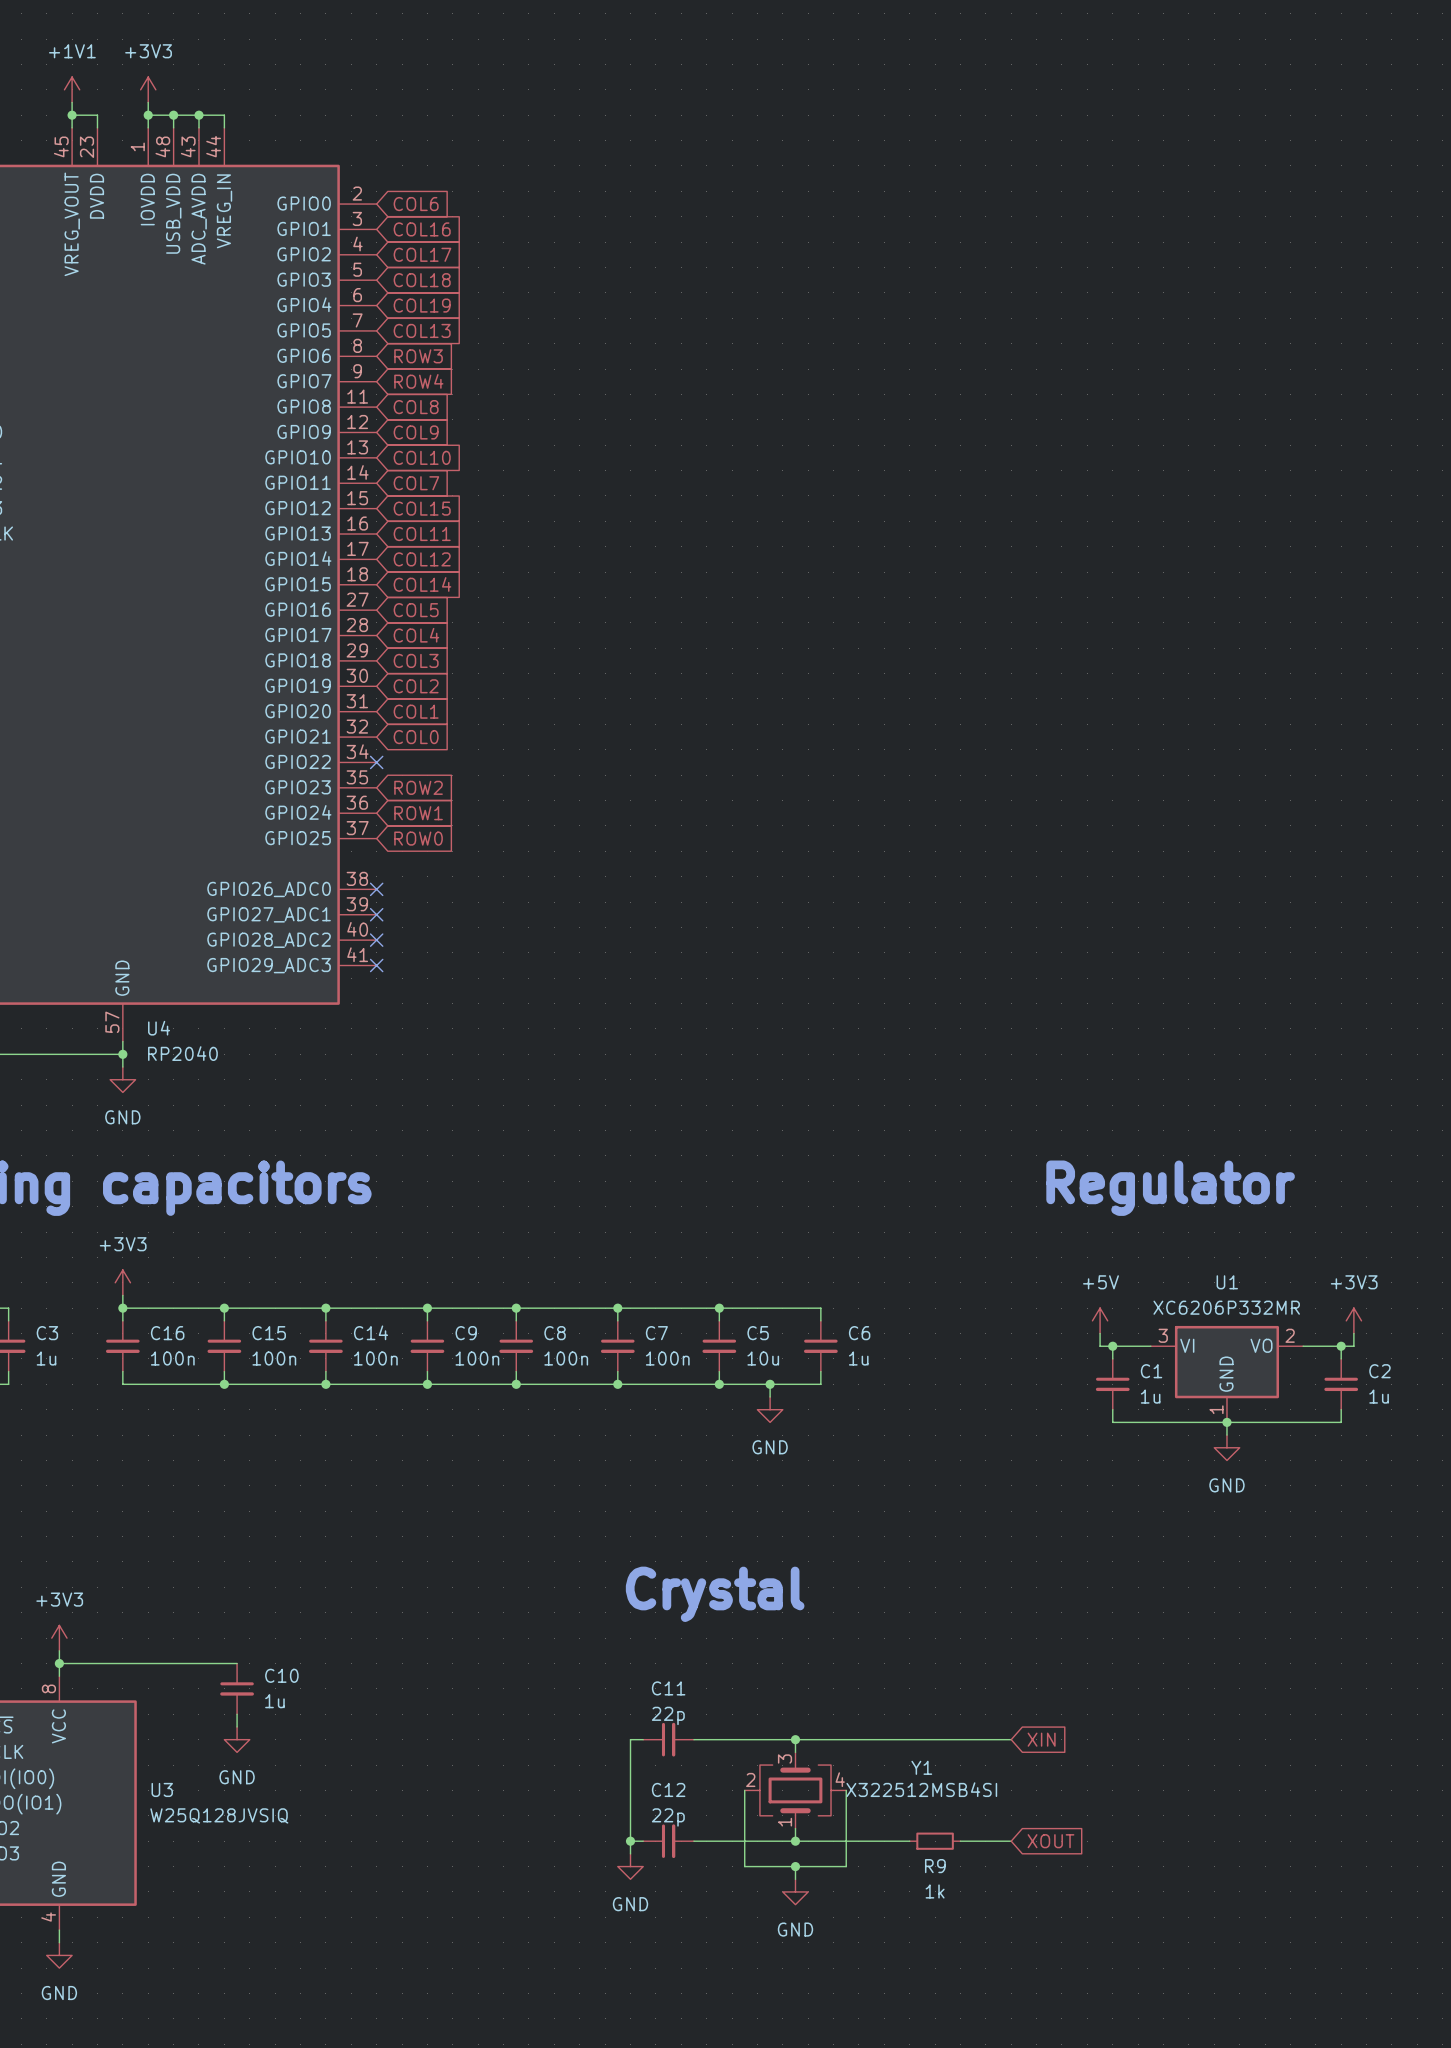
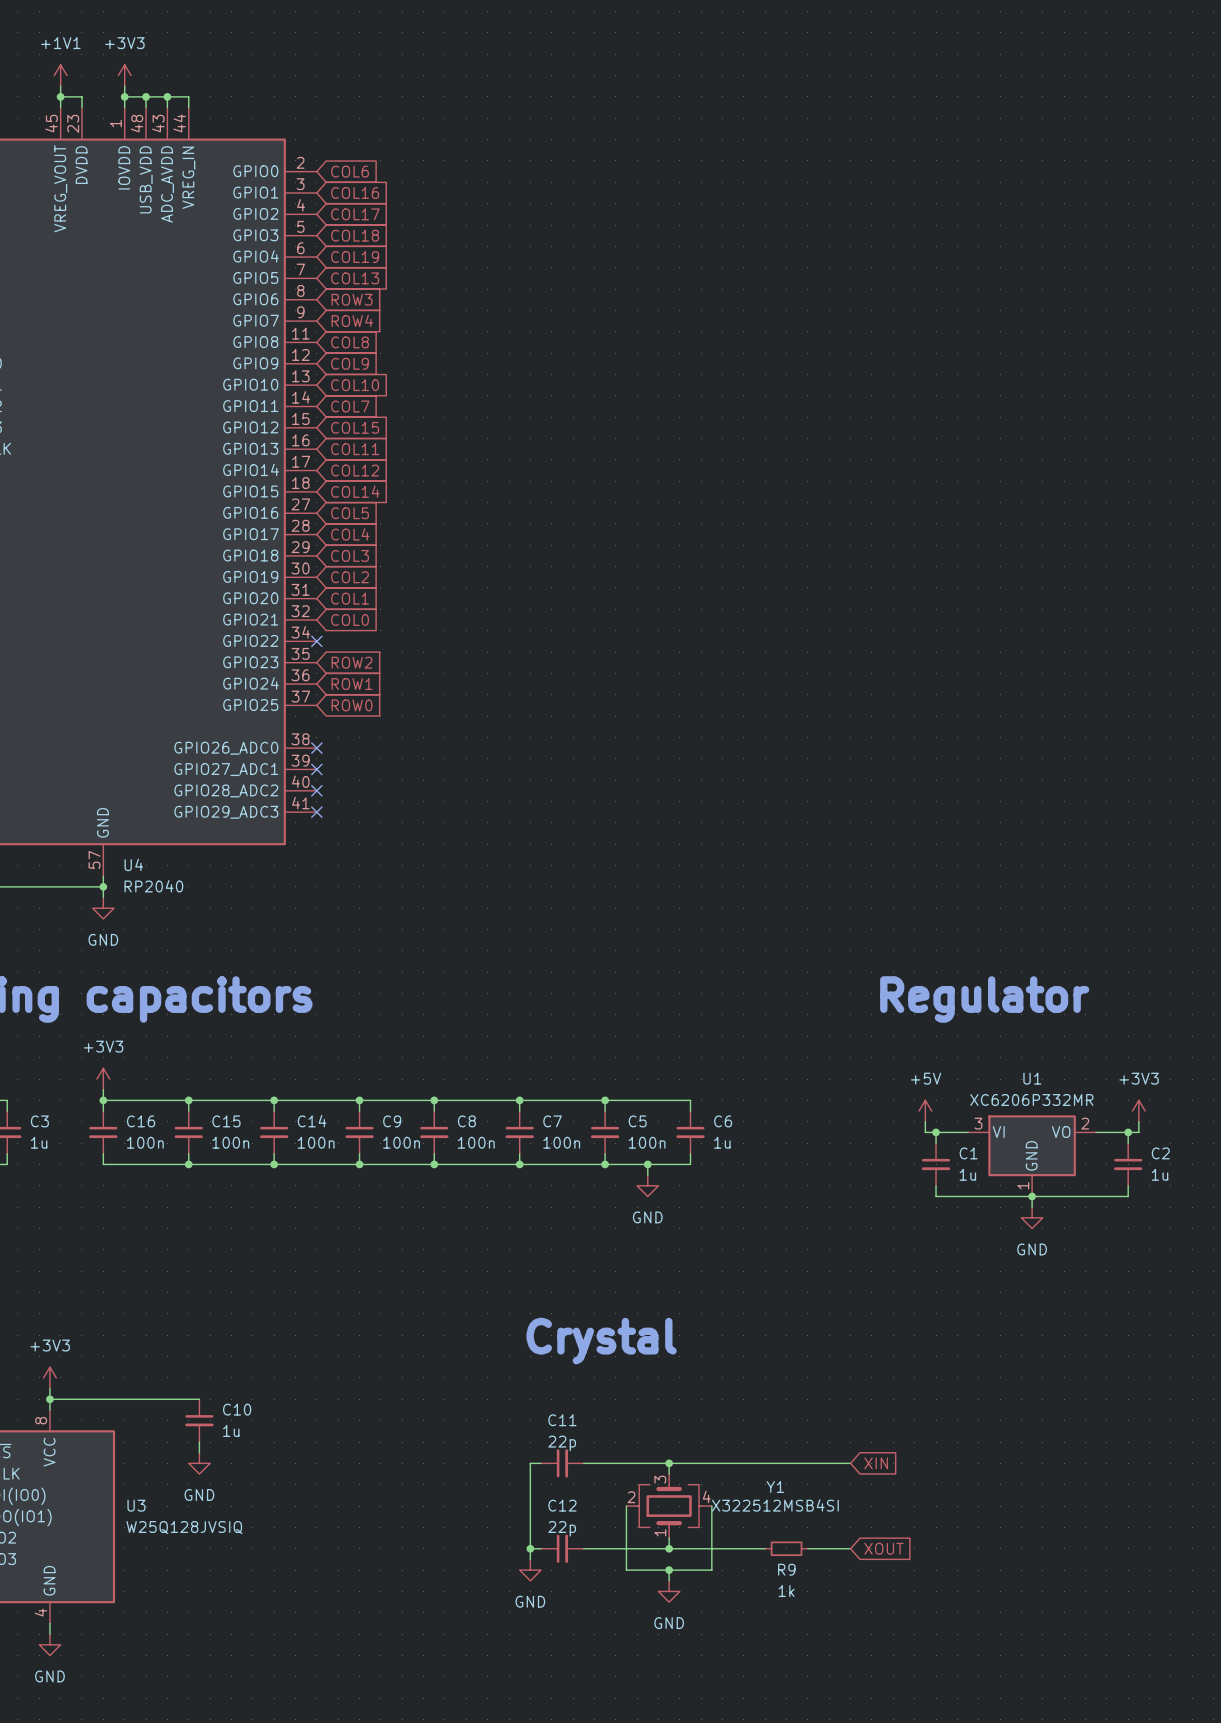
C5 value: 10u (763, 1358) -> 100n (647, 1142)

